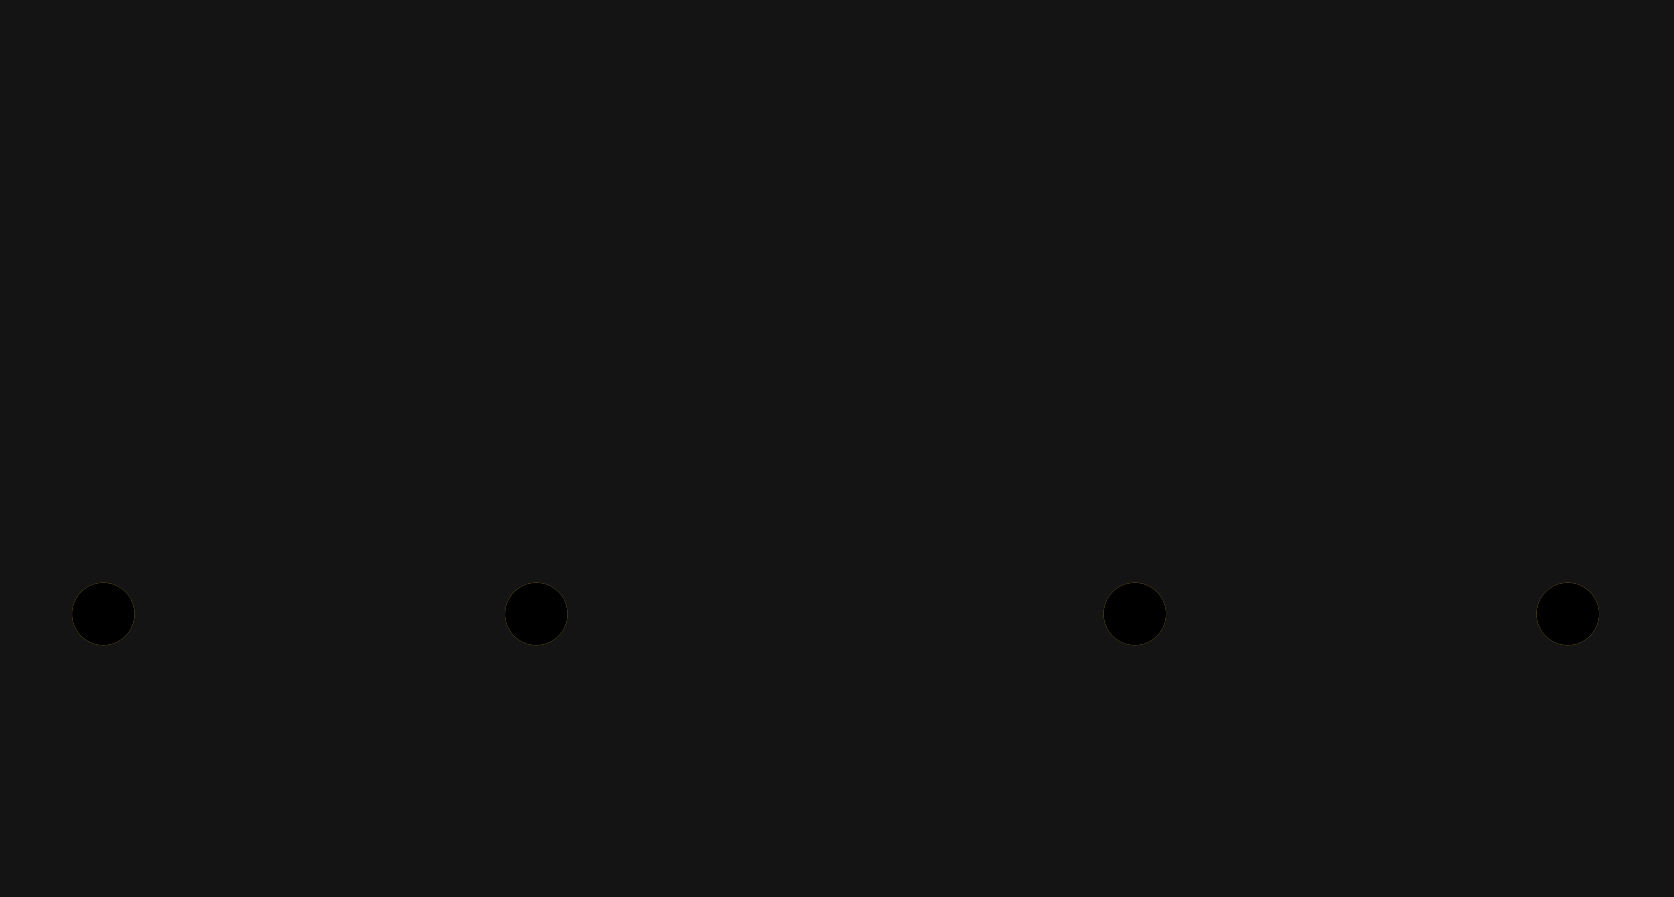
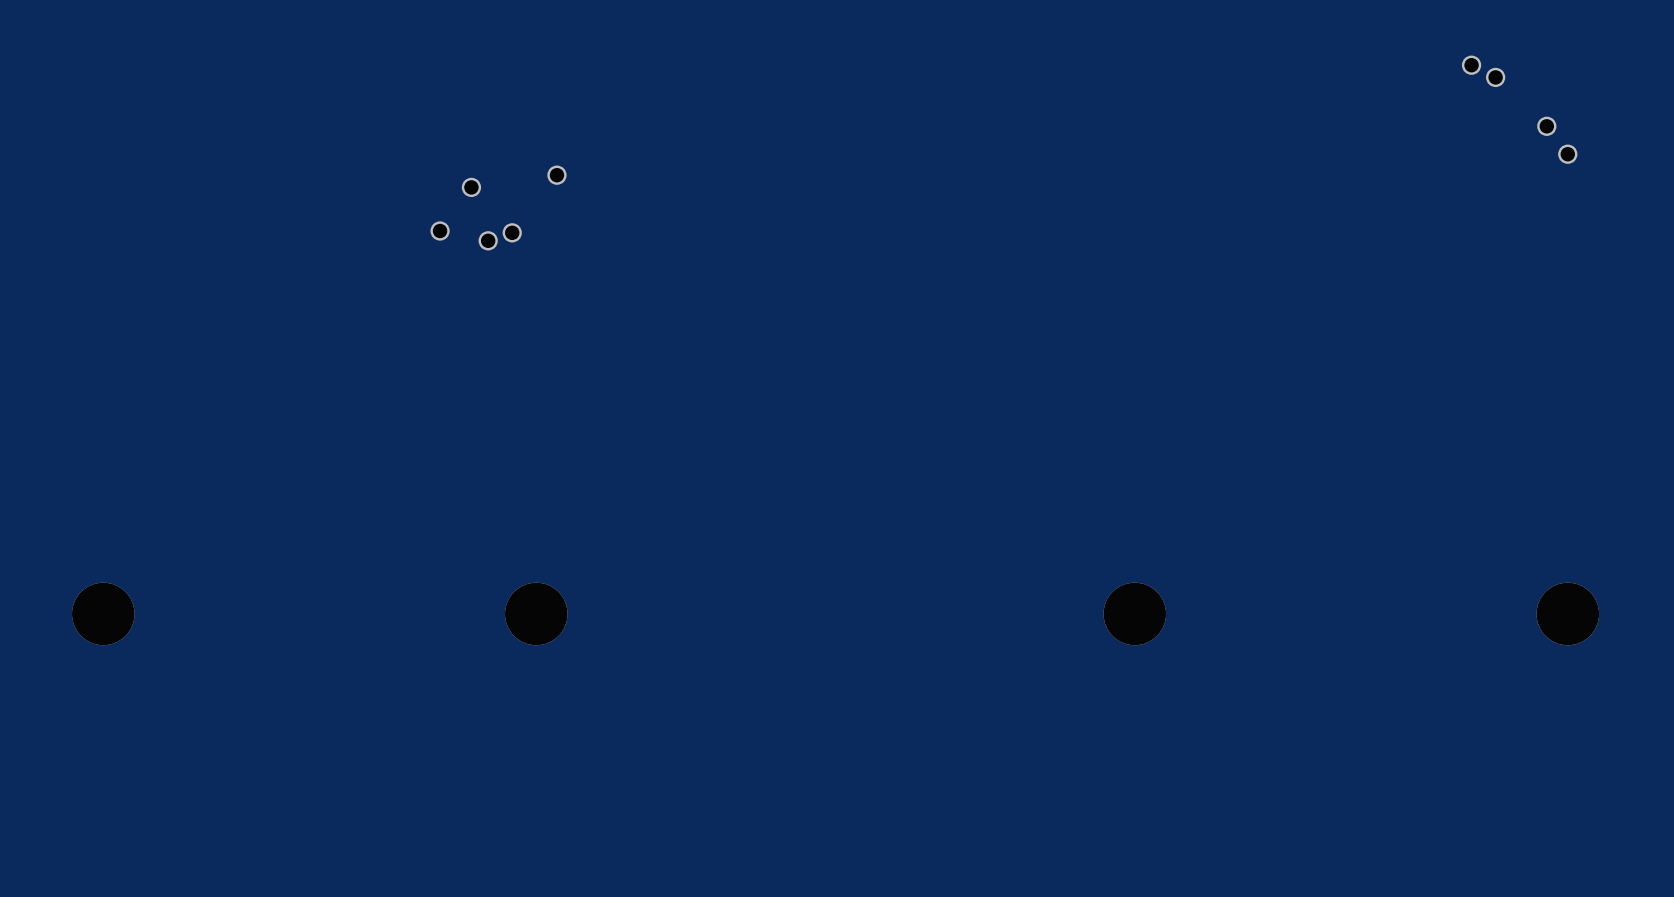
via: none -> (1471, 65)
via: none -> (1495, 77)
via: none -> (1546, 126)
via: none -> (1567, 154)
via: none -> (556, 175)
via: none -> (471, 187)
via: none -> (440, 230)
via: none -> (512, 232)
via: none -> (488, 240)

